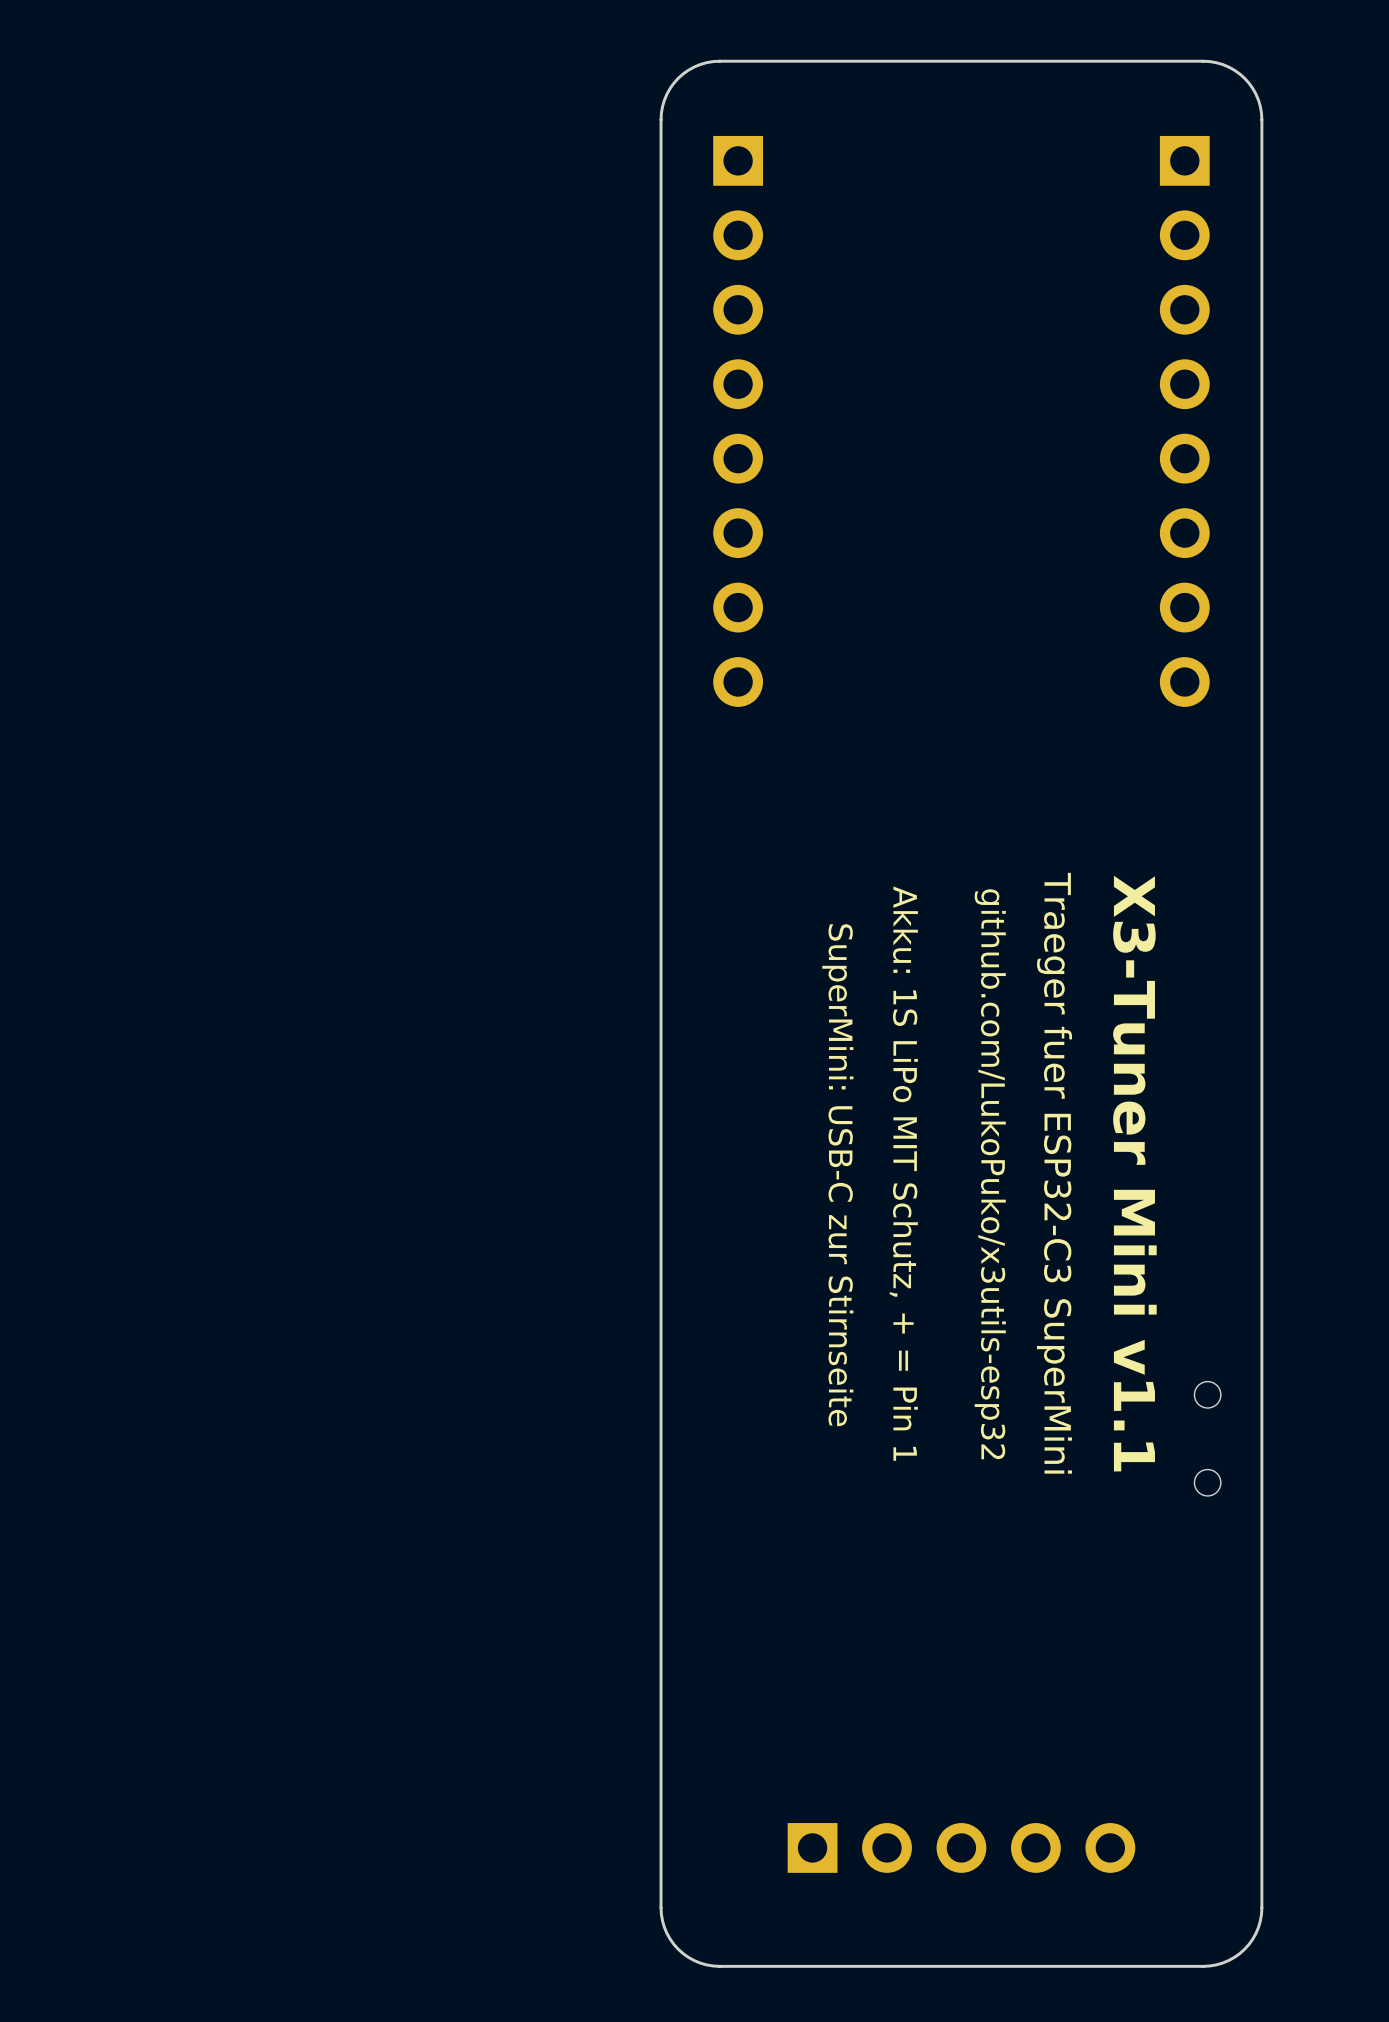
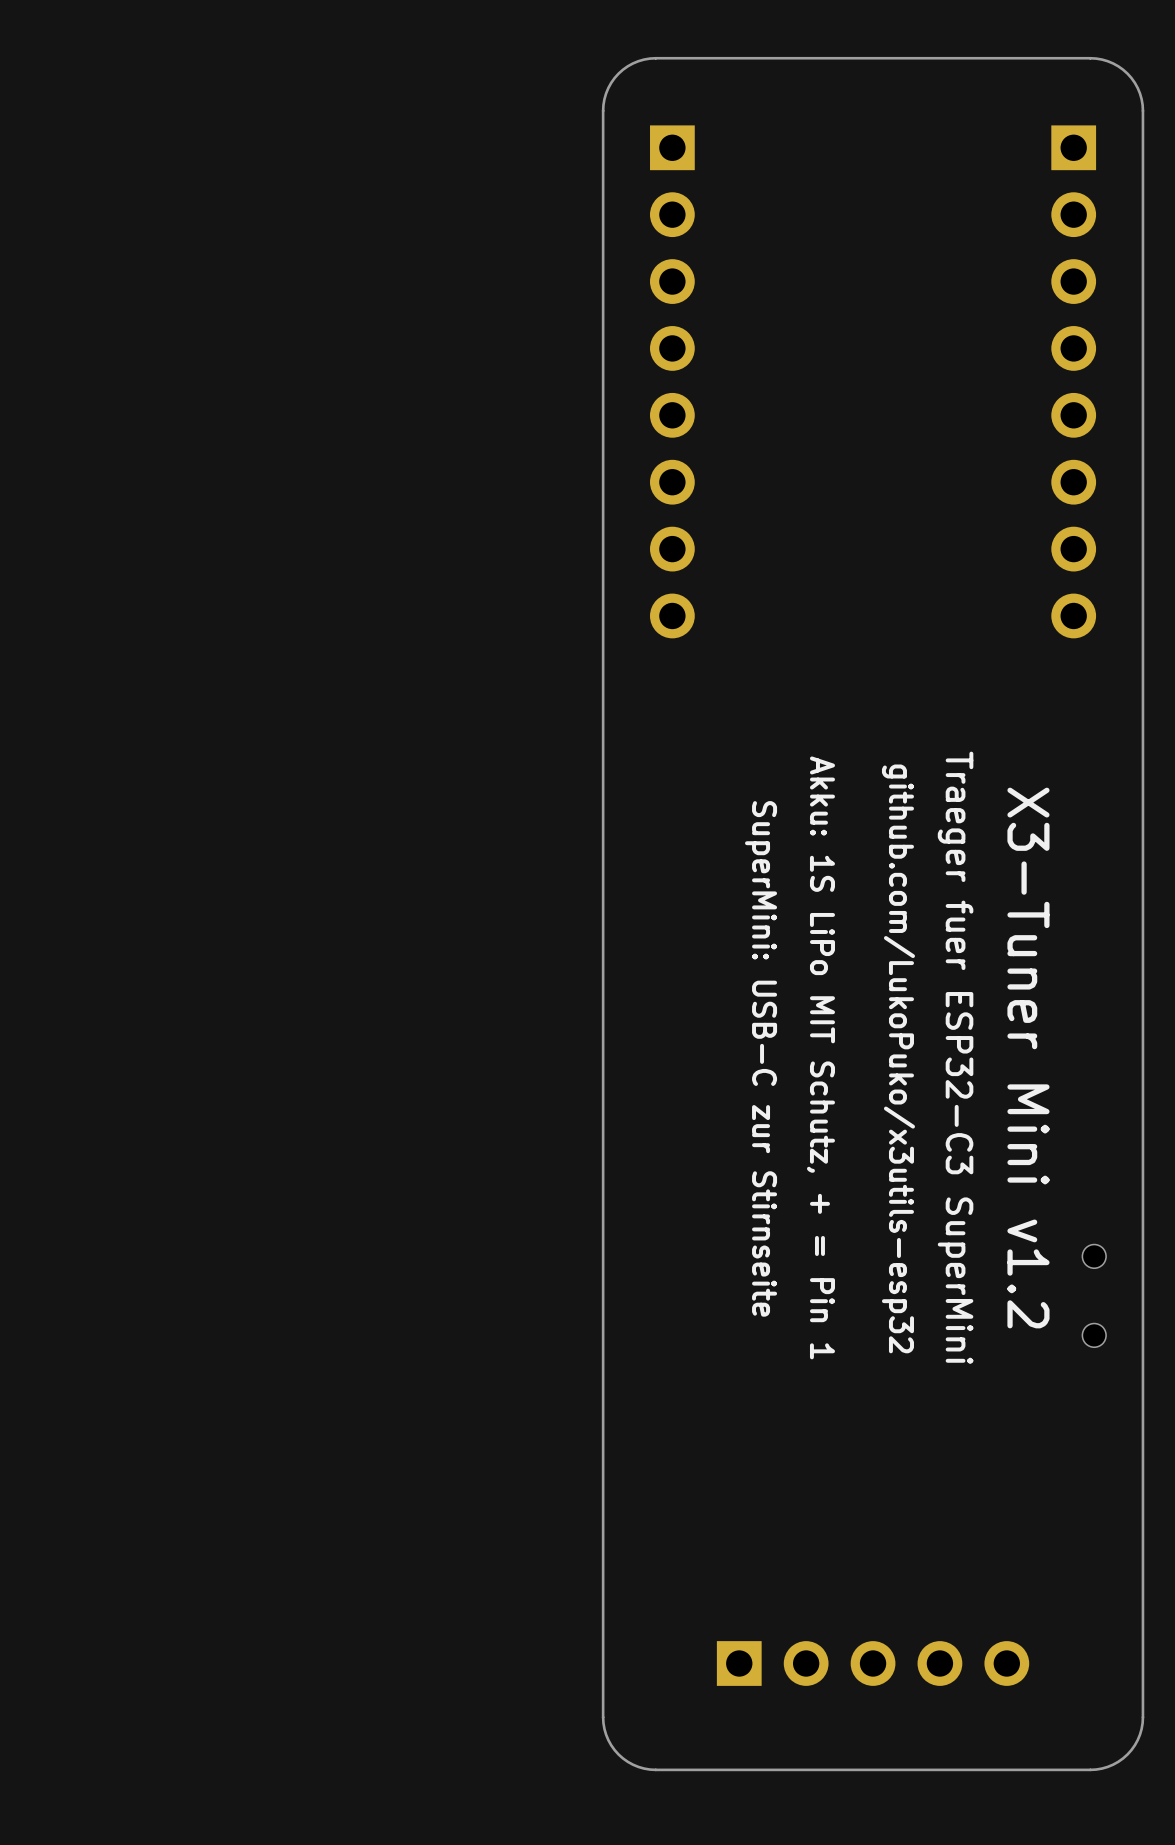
text: X3-Tuner Mini v1.1 (1134, 1173) -> X3-Tuner Mini v1.2 (1028, 1058)

